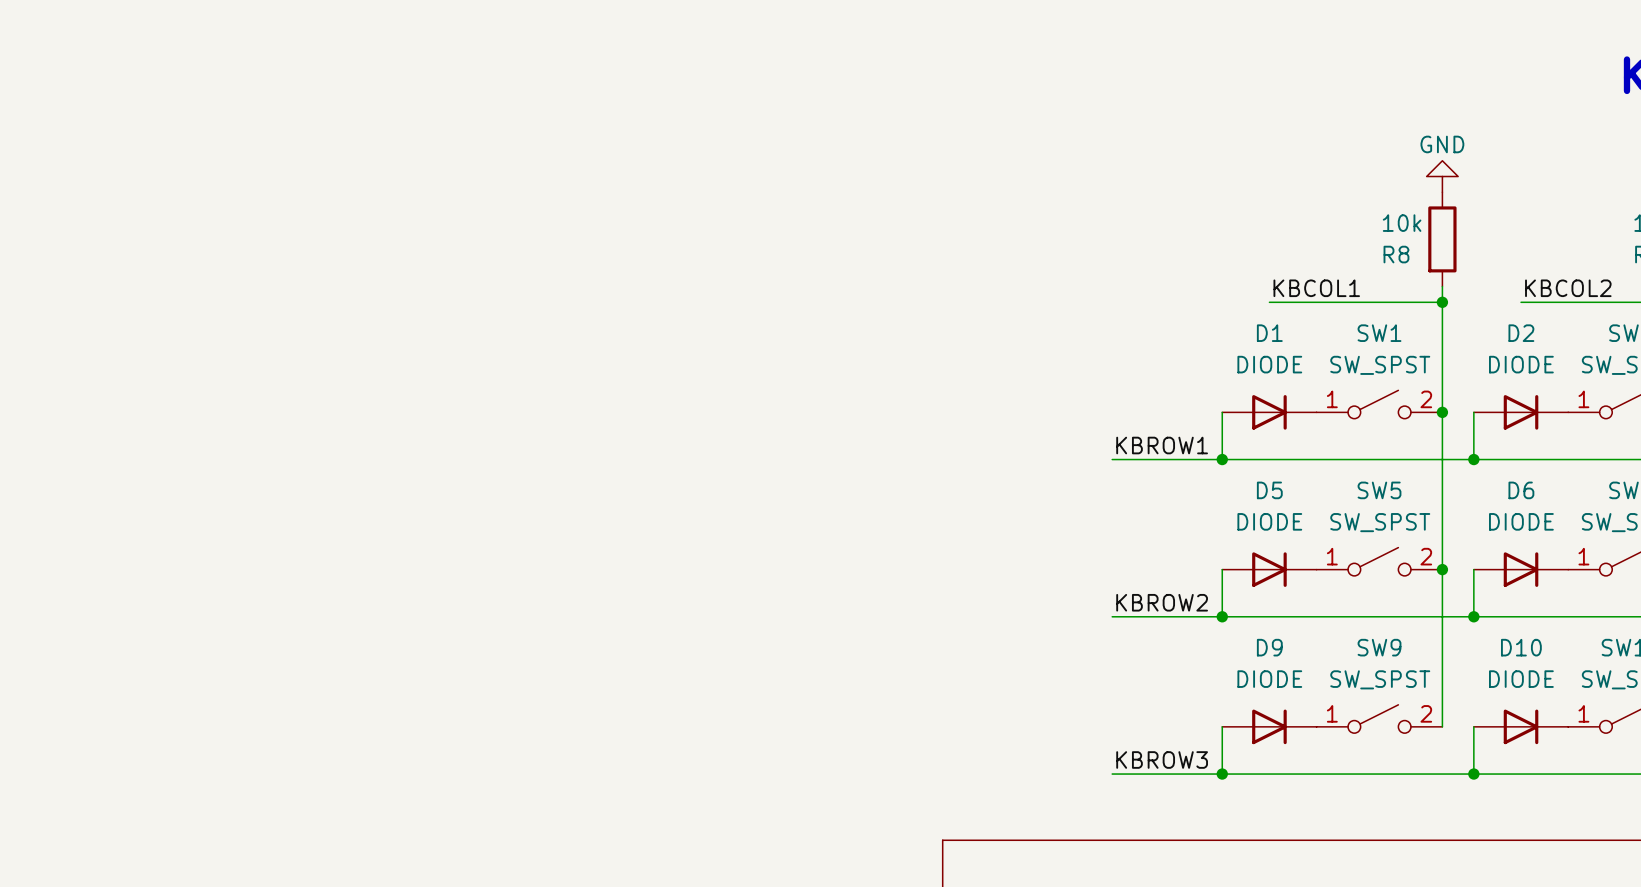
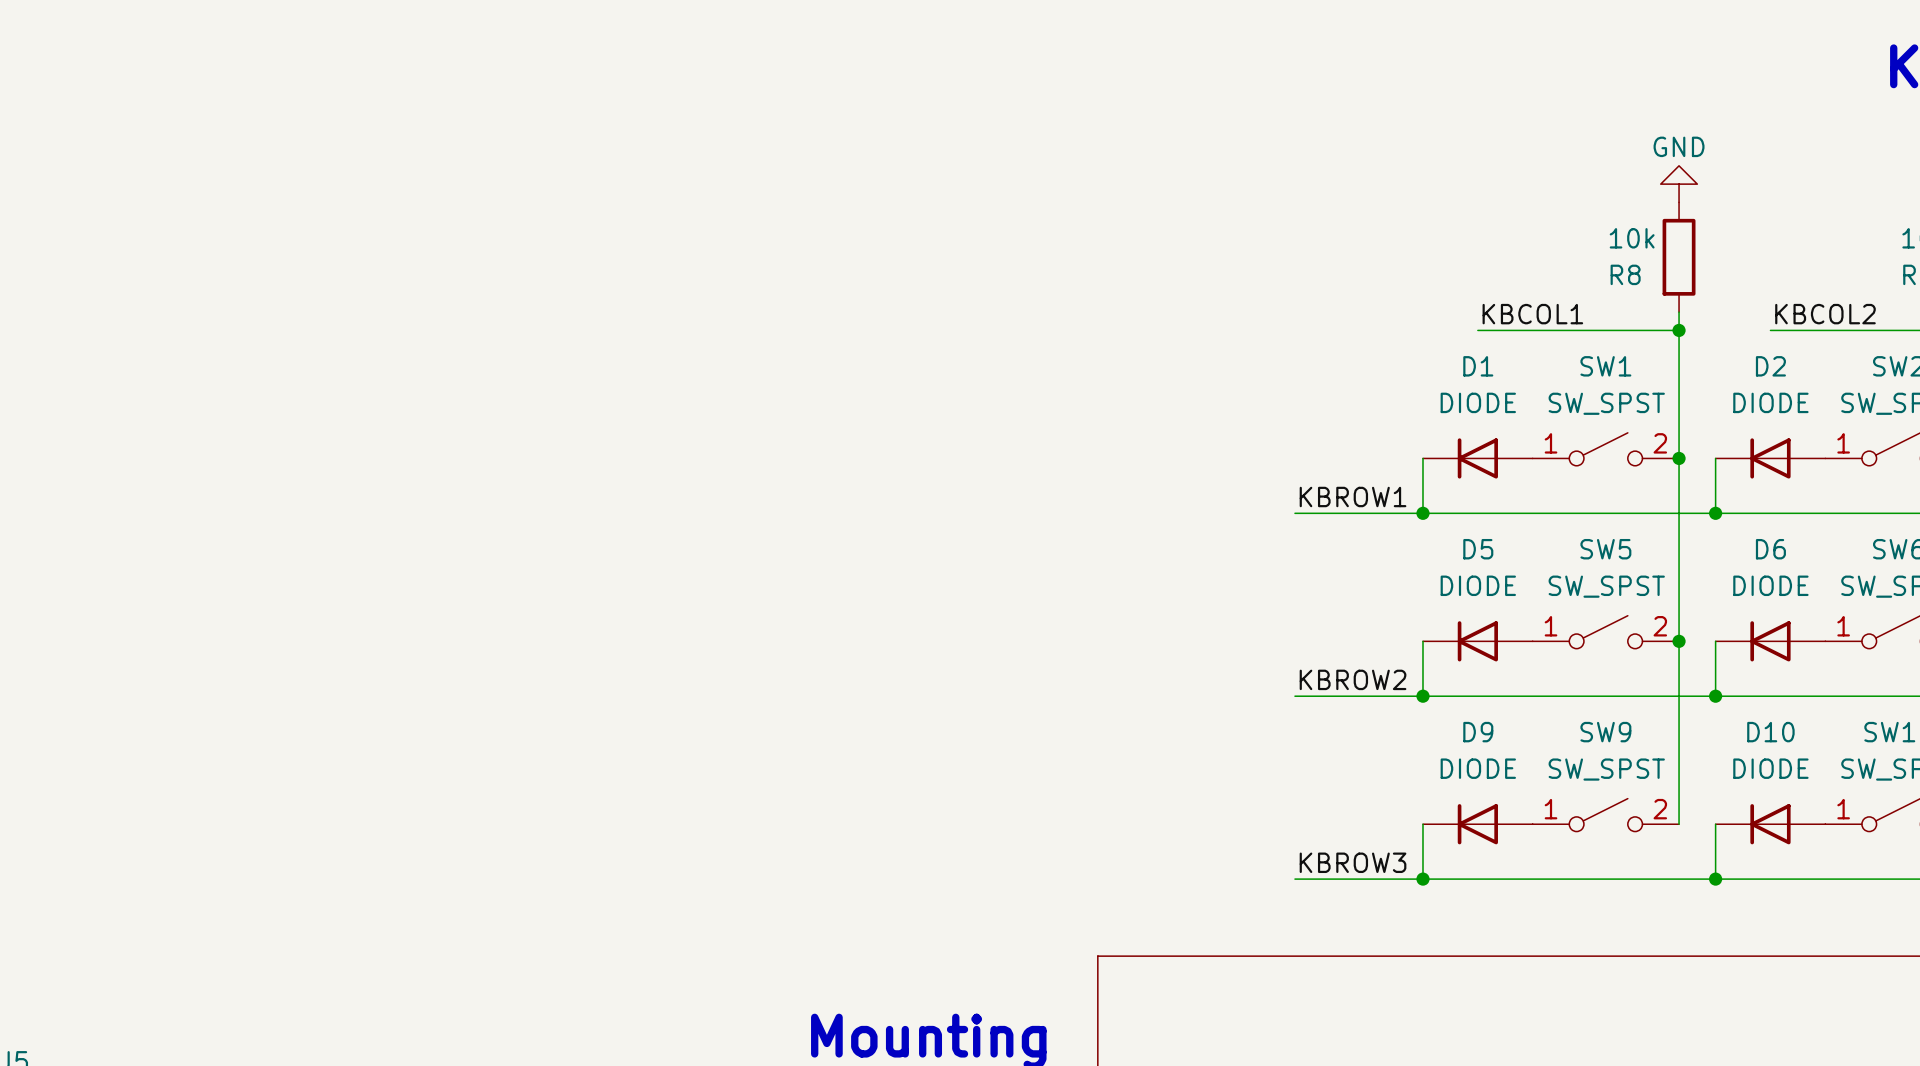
D1 rotation: 0° (1269, 412) -> 180° (1477, 458)
D2 rotation: 0° (1521, 412) -> 180° (1770, 458)
D5 rotation: 0° (1269, 569) -> 180° (1477, 641)
D6 rotation: 0° (1521, 569) -> 180° (1770, 641)
D9 rotation: 0° (1269, 726) -> 180° (1477, 824)
D10 rotation: 0° (1521, 726) -> 180° (1770, 824)

